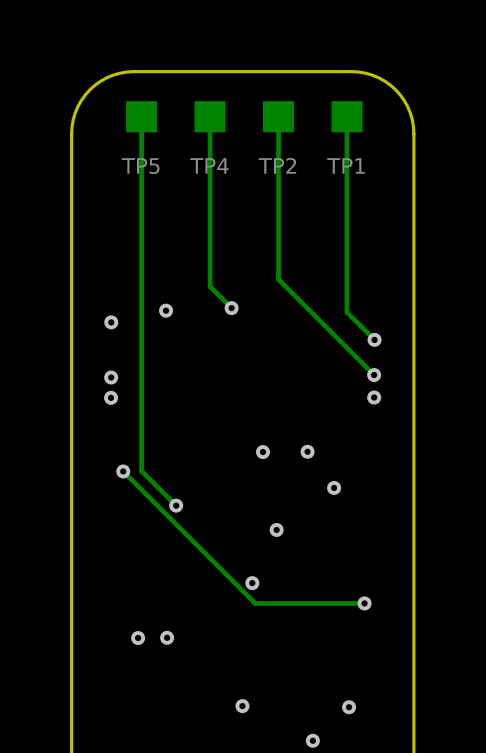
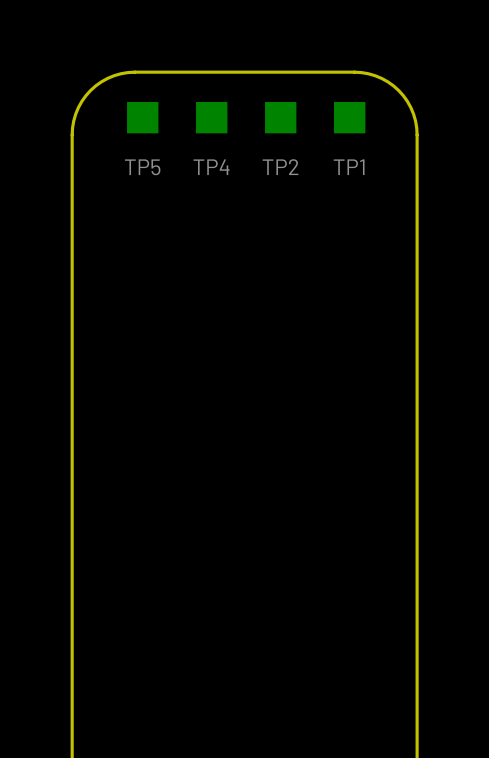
track: (141, 116) (141, 471) (176, 505) -> none
track: (210, 116) (210, 286) (231, 308) -> none
track: (278, 116) (278, 279) (374, 375) -> none
track: (347, 116) (347, 312) (374, 339) -> none
via: (231, 308) -> none
via: (166, 310) -> none
via: (111, 322) -> none
via: (374, 339) -> none
via: (374, 375) -> none
via: (111, 377) -> none
via: (111, 397) -> none
via: (374, 397) -> none
via: (307, 451) -> none
via: (262, 452) -> none
track: (123, 471) (255, 603) (364, 603) -> none
via: (123, 471) -> none
via: (334, 487) -> none
via: (176, 505) -> none
via: (276, 529) -> none
via: (252, 583) -> none
via: (364, 603) -> none
via: (167, 637) -> none
via: (138, 638) -> none
via: (242, 706) -> none
via: (349, 707) -> none
via: (312, 740) -> none

